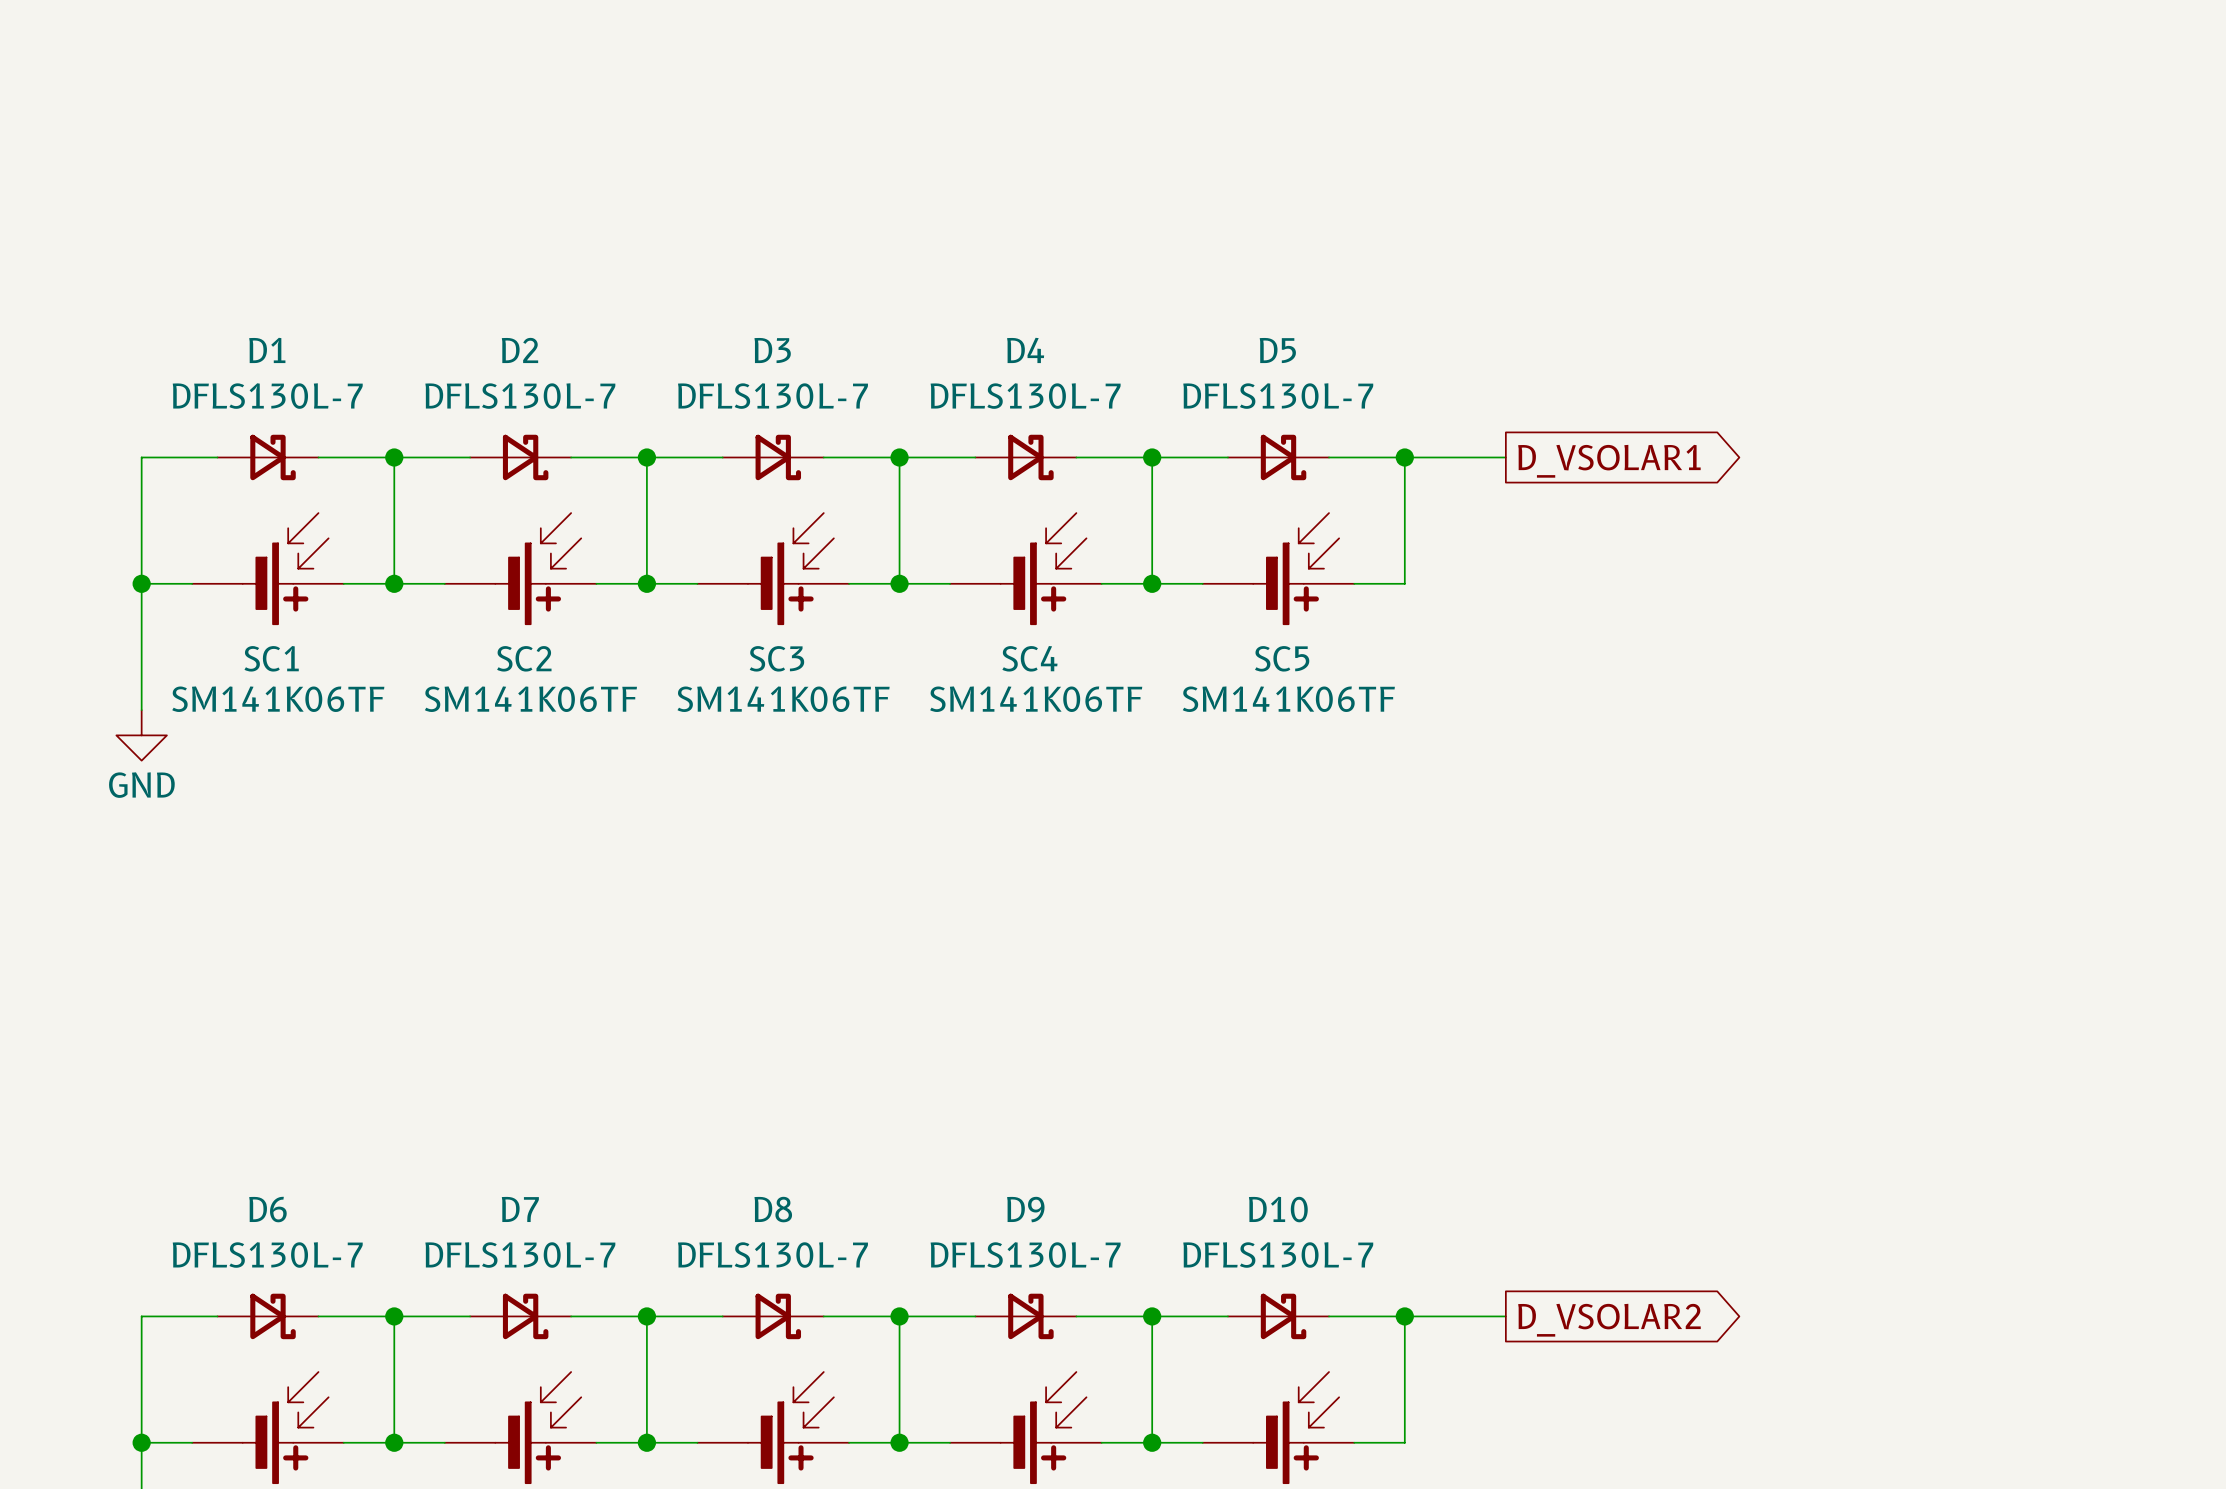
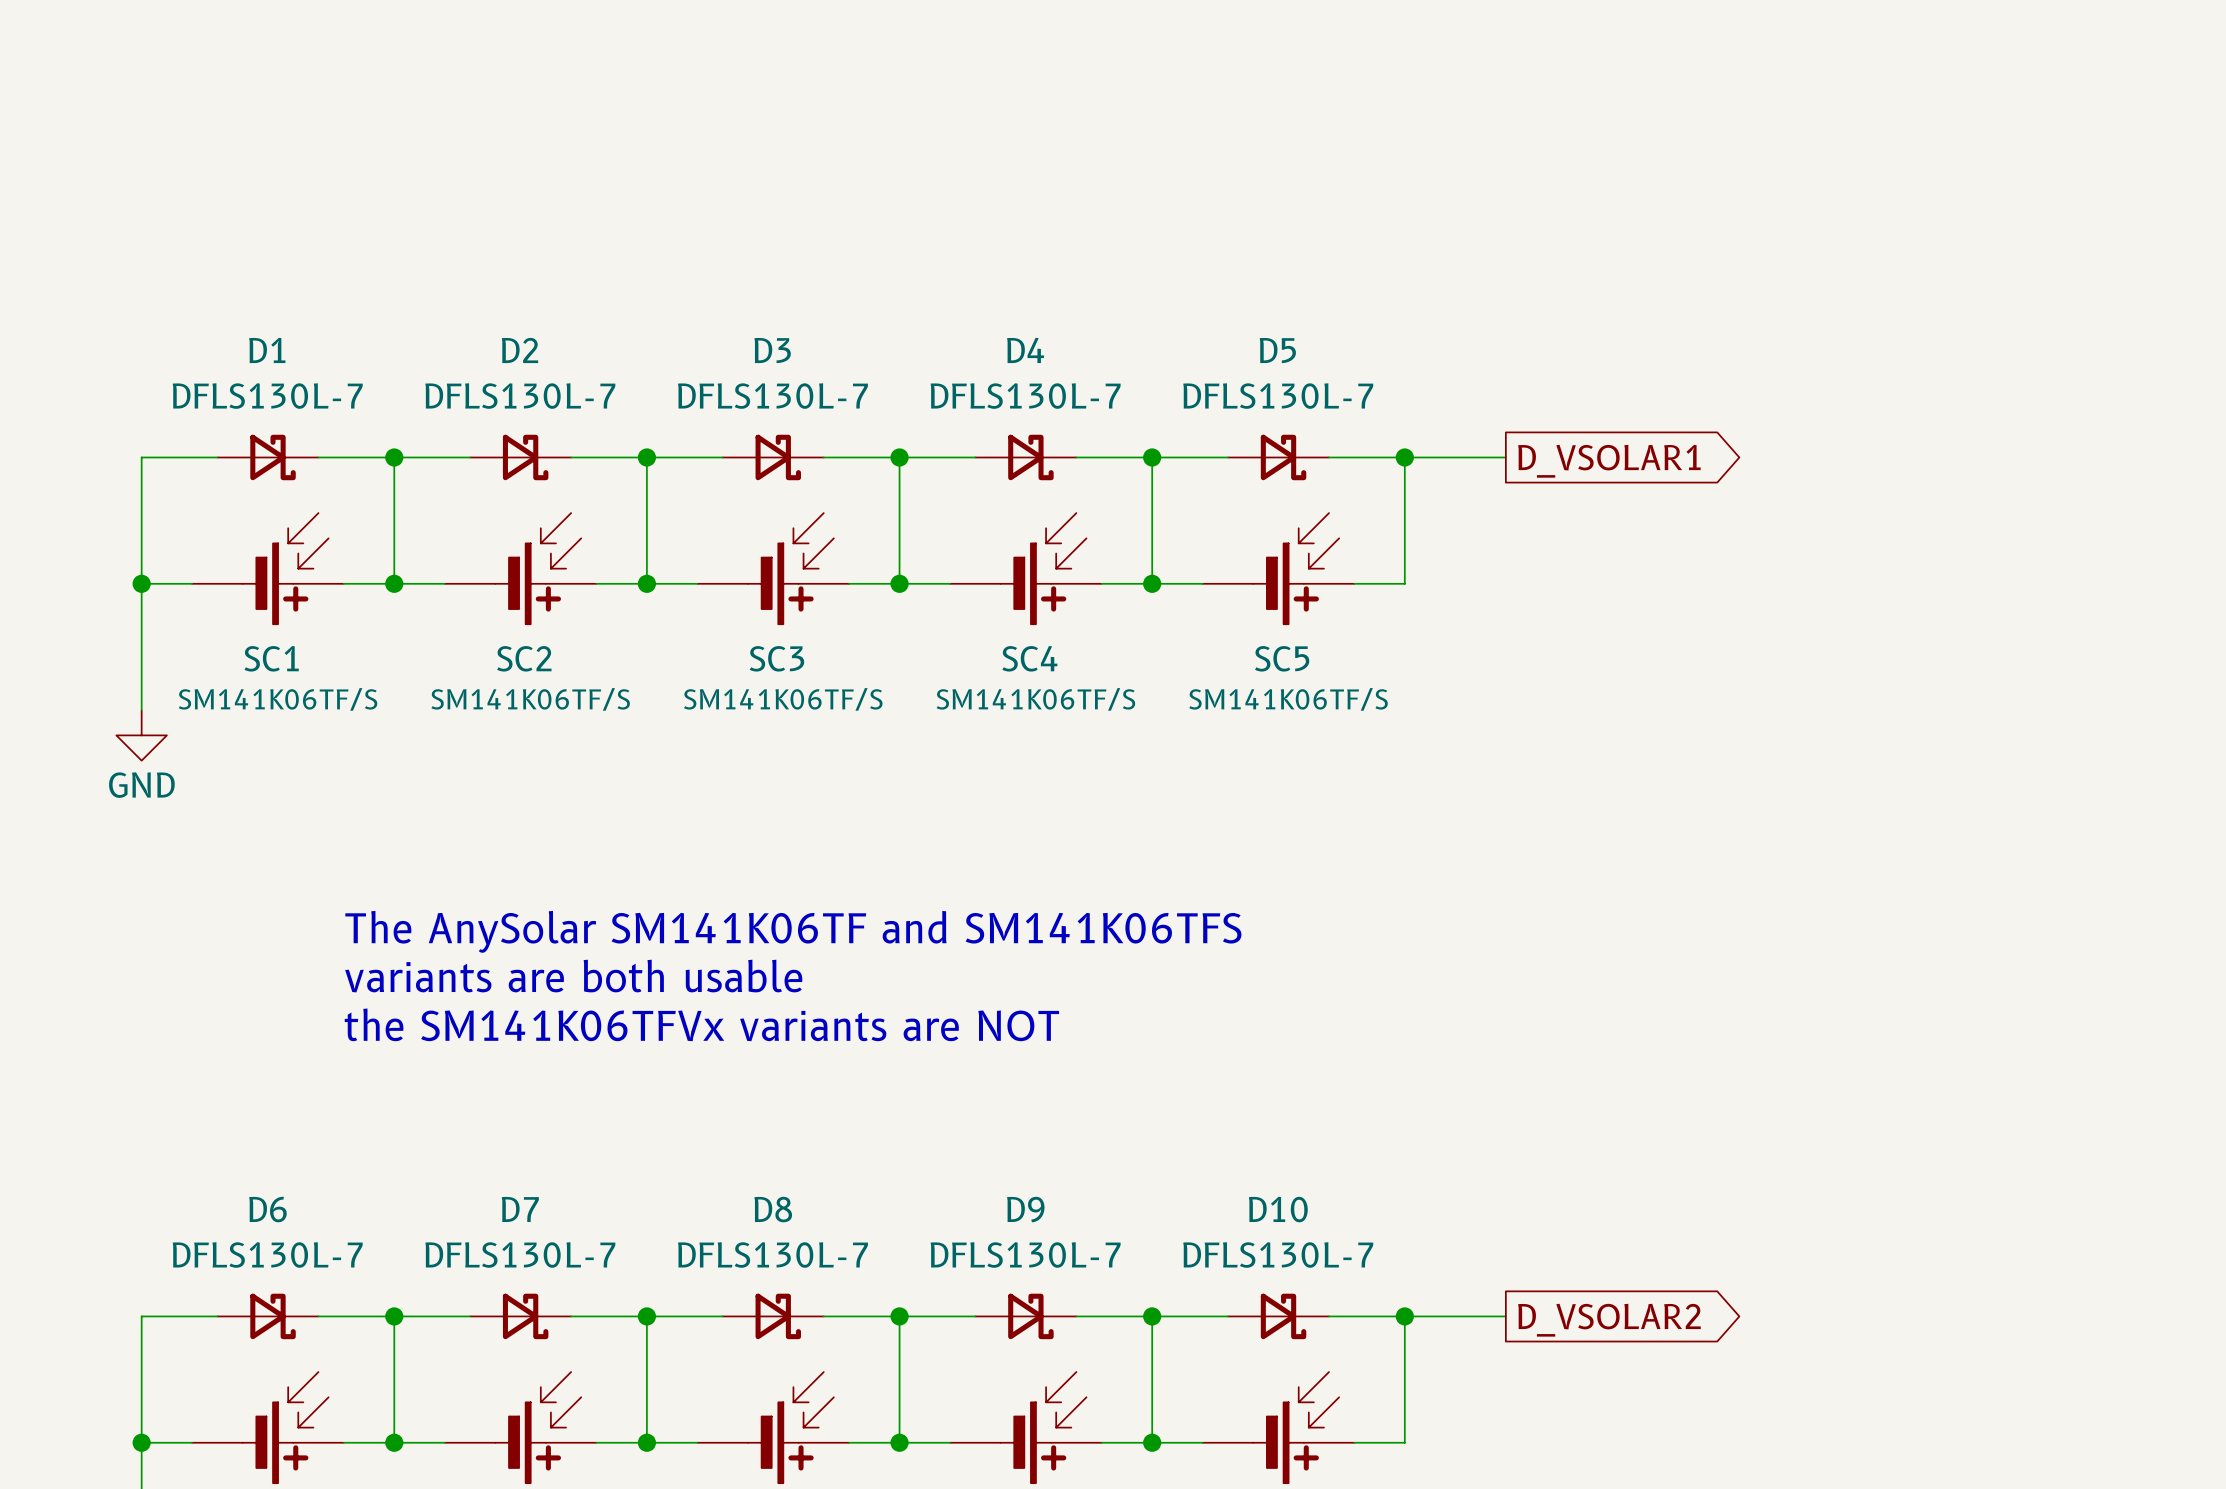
SC1 value: SM141K06TF (278, 699) -> SM141K06TF/S (278, 699)
SC2 value: SM141K06TF (530, 699) -> SM141K06TF/S (530, 699)
SC3 value: SM141K06TF (783, 699) -> SM141K06TF/S (783, 699)
SC4 value: SM141K06TF (1036, 699) -> SM141K06TF/S (1035, 699)
SC5 value: SM141K06TF (1288, 699) -> SM141K06TF/S (1288, 699)
text: none -> The AnySolar SM141K06TF and SM141K06TFS (793, 931)
text: none -> variants are both usable (573, 976)
text: none -> the SM141K06TFVx variants are NOT (701, 1024)

